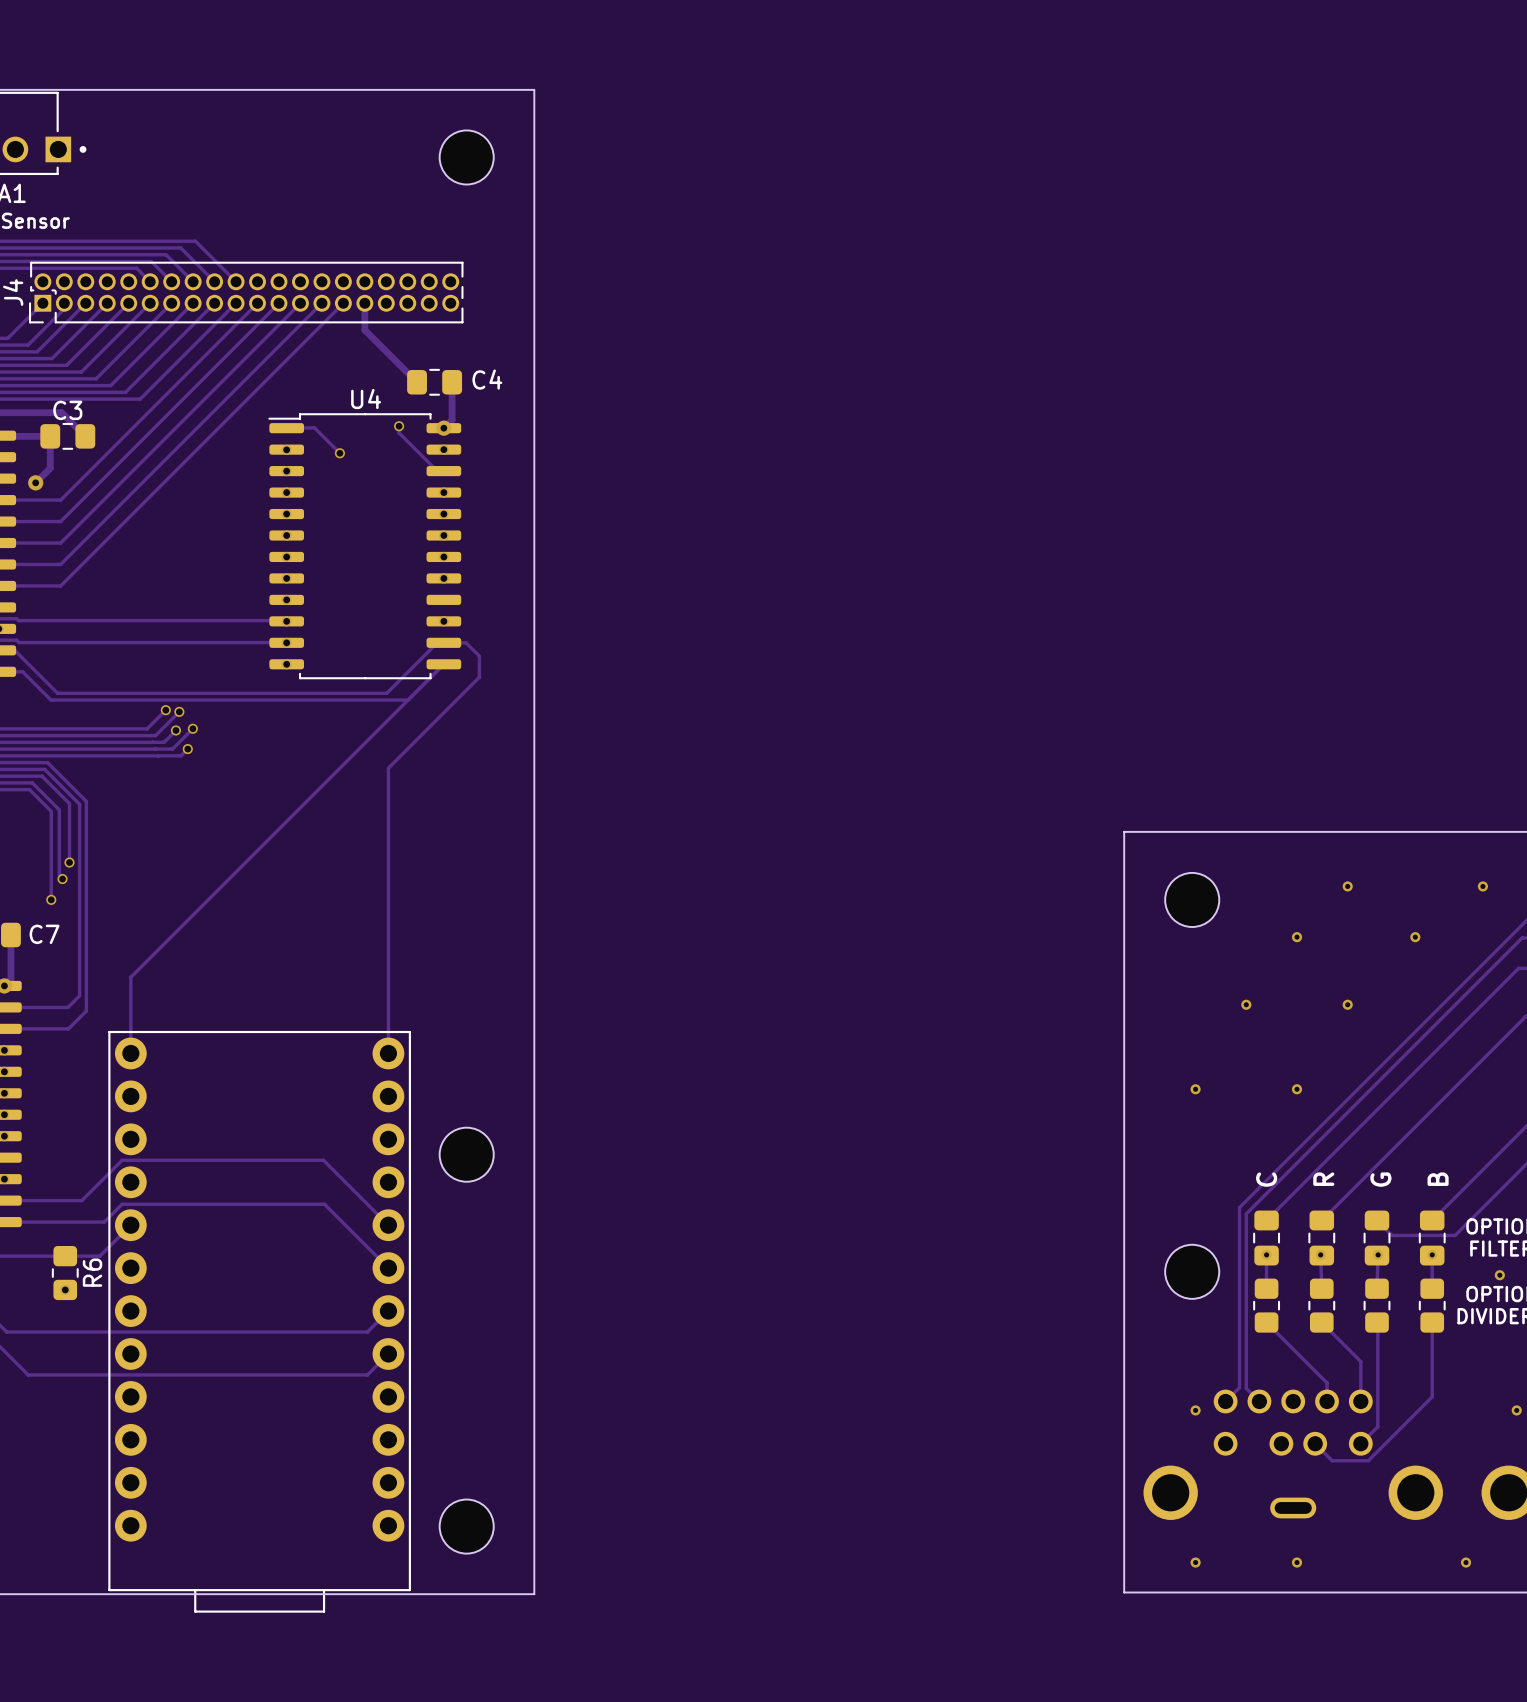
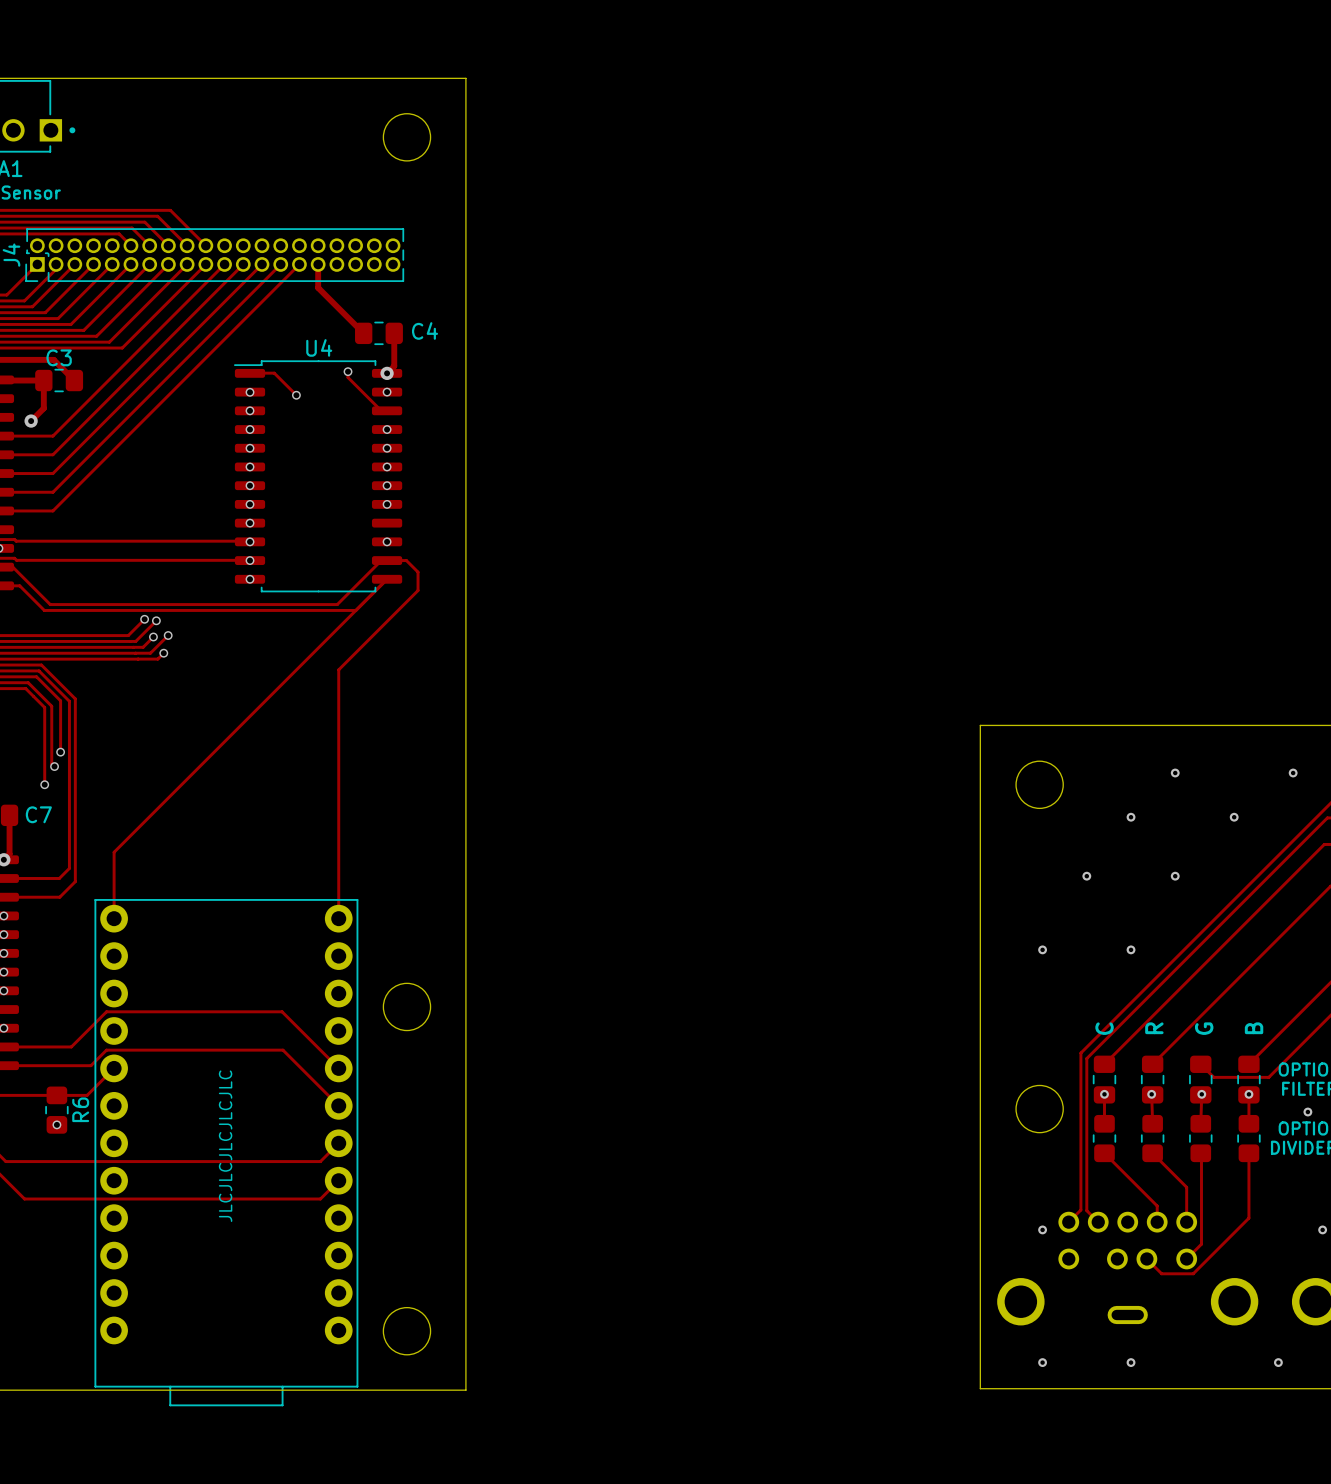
text: none -> JLCJLCJLCJLCJLC (225, 1146)

